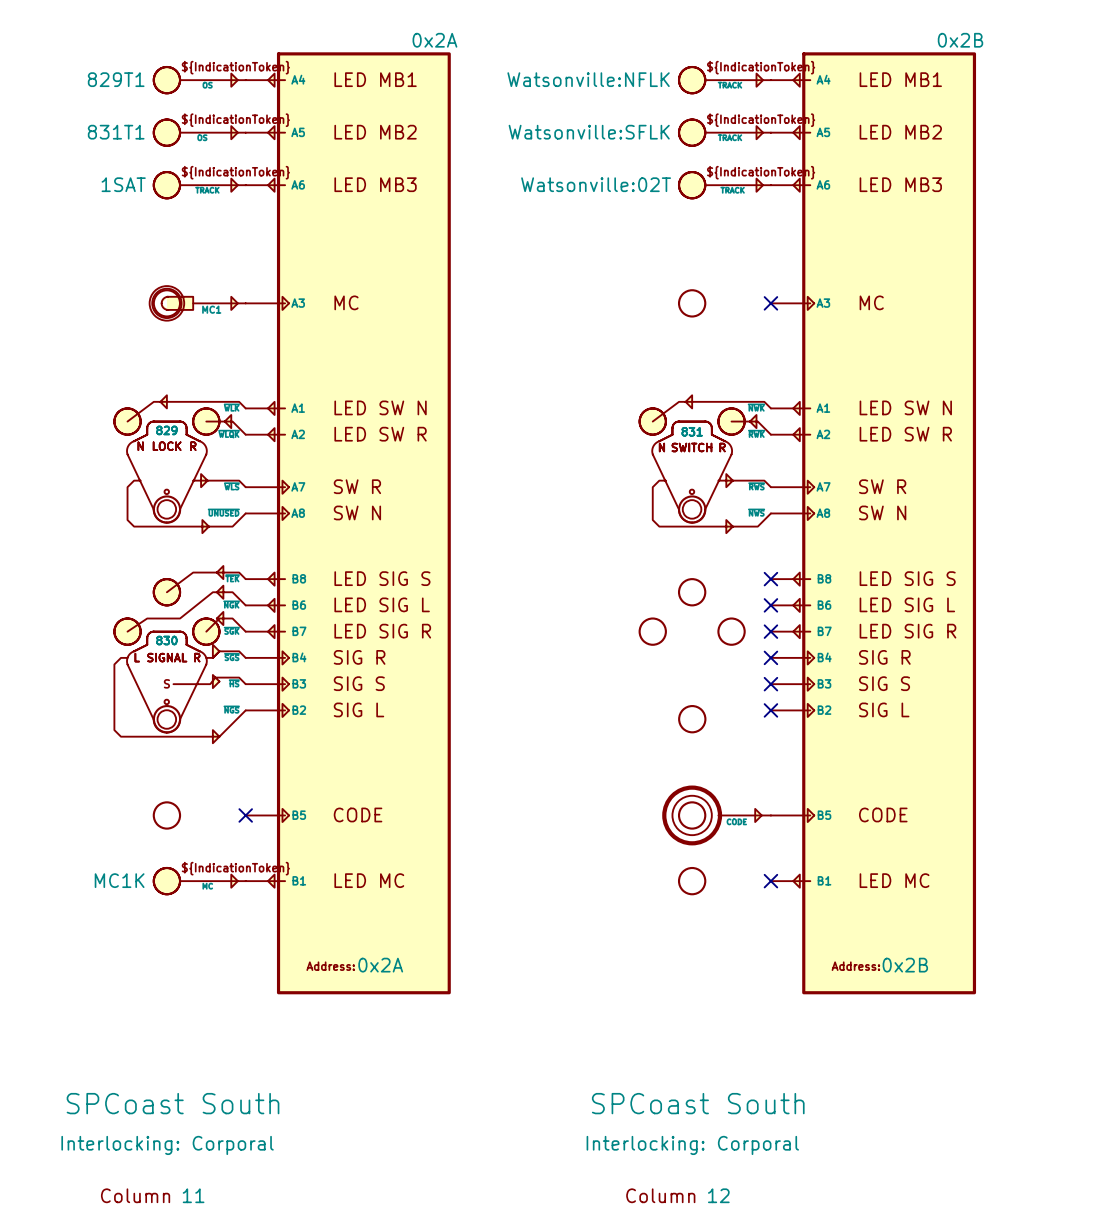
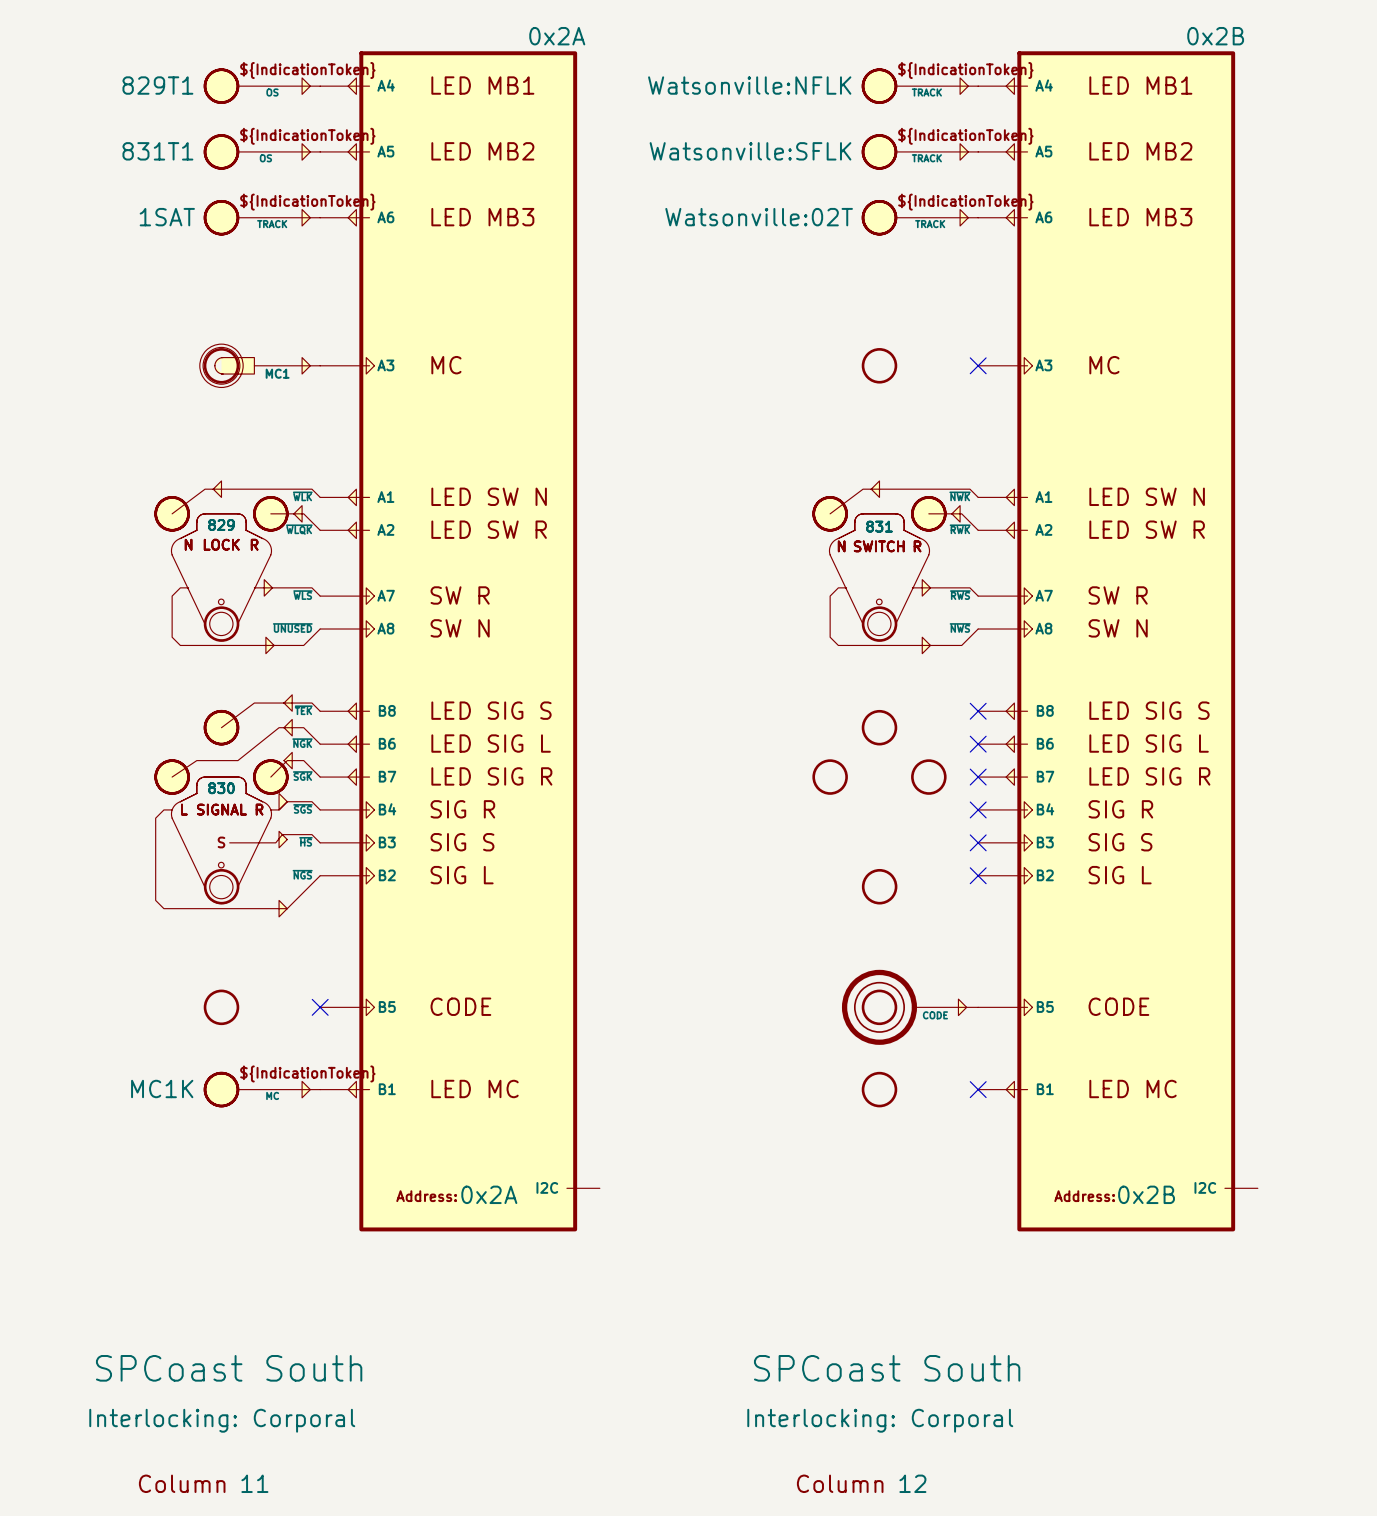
part symbol: [245, 52, 451, 995] -> [320, 51, 600, 1232]
part symbol: [770, 52, 977, 995] -> [978, 51, 1258, 1232]

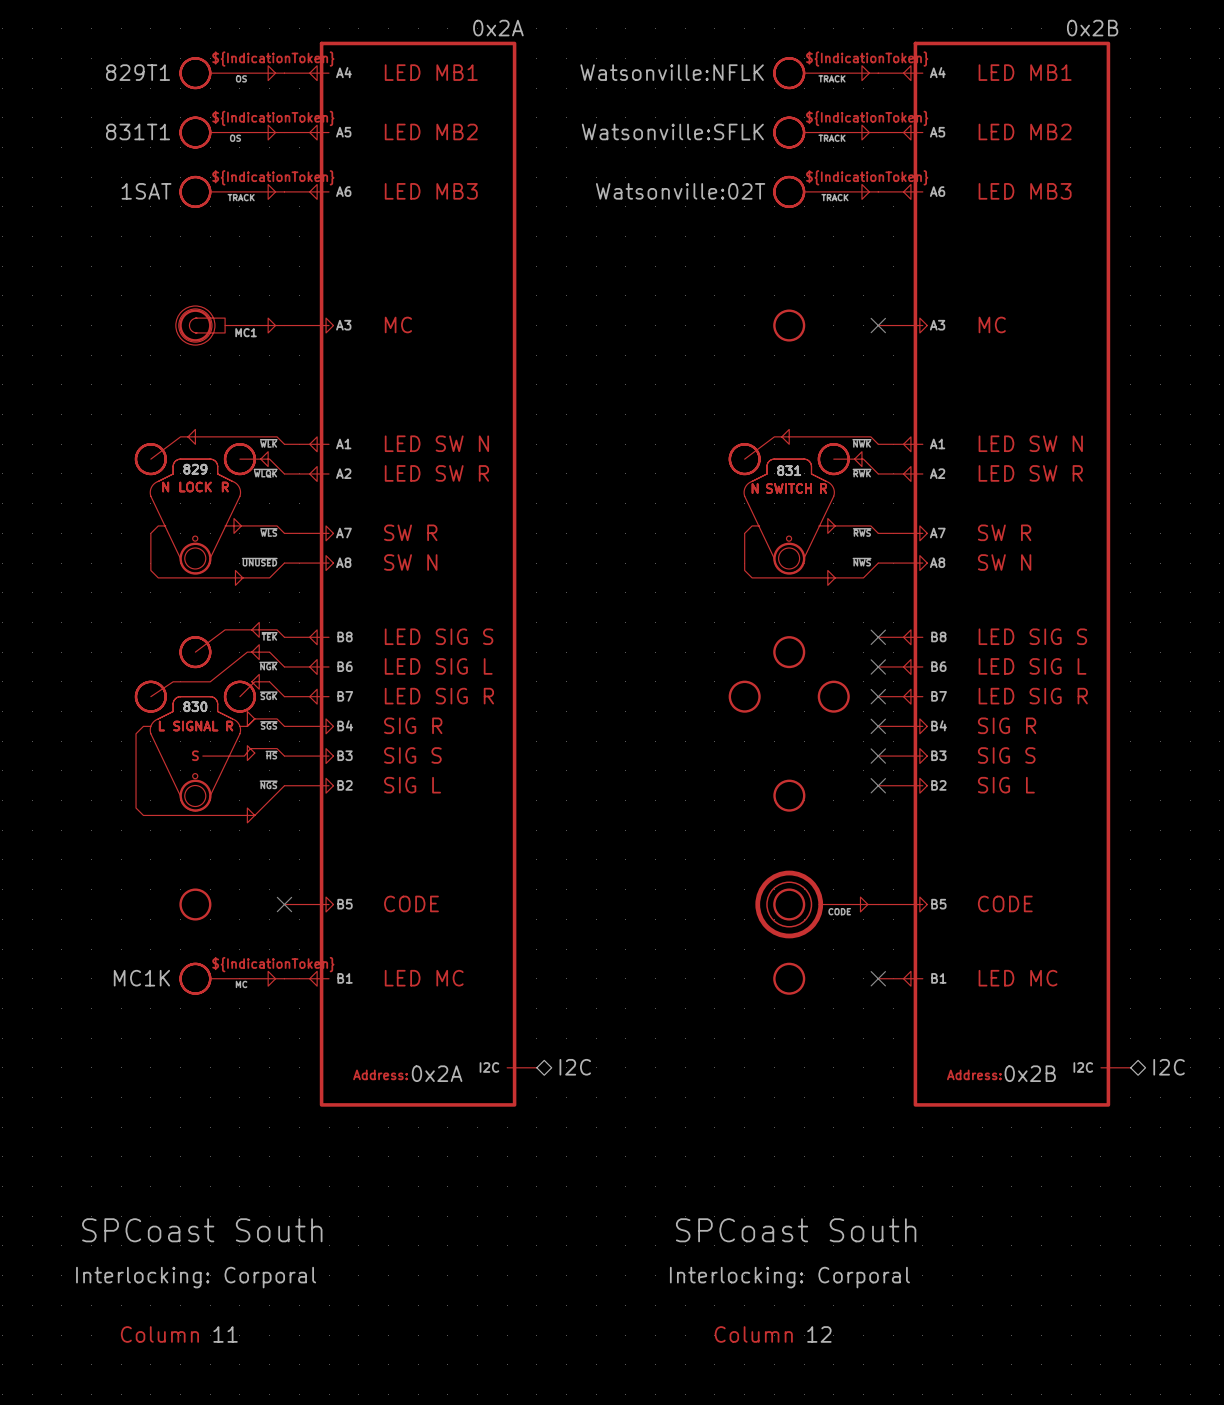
hierarchical label: none -> I2C (575, 1067)
hierarchical label: none -> I2C (1169, 1067)

